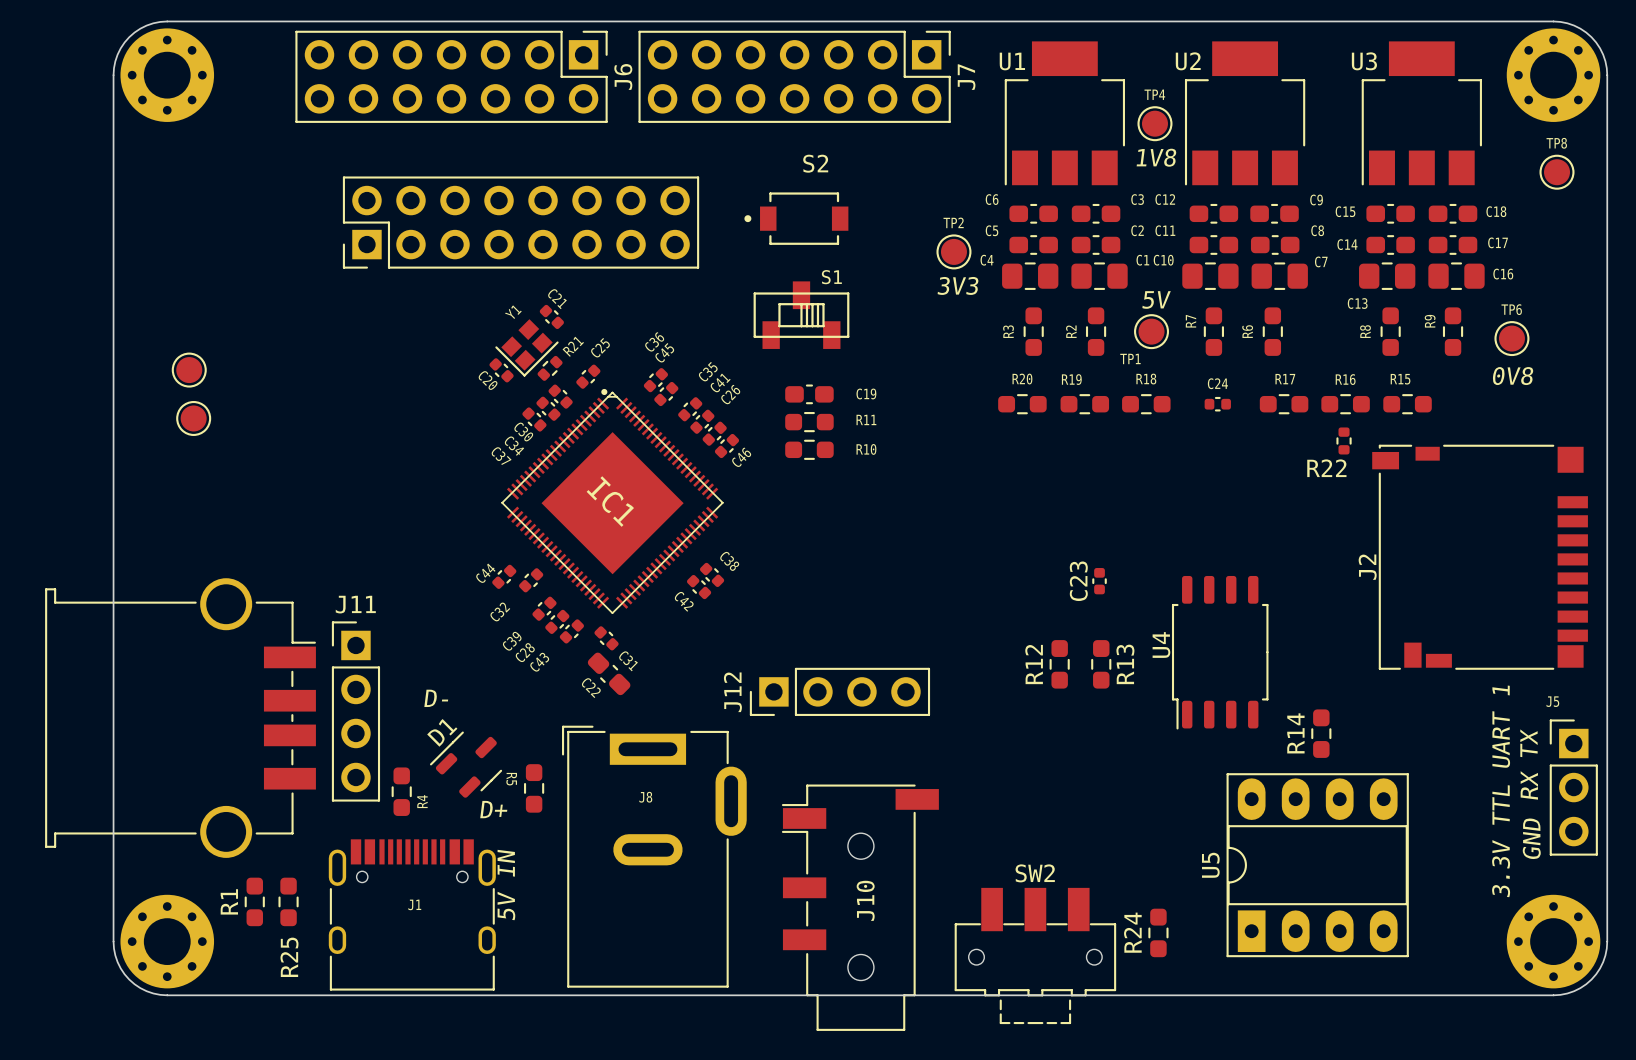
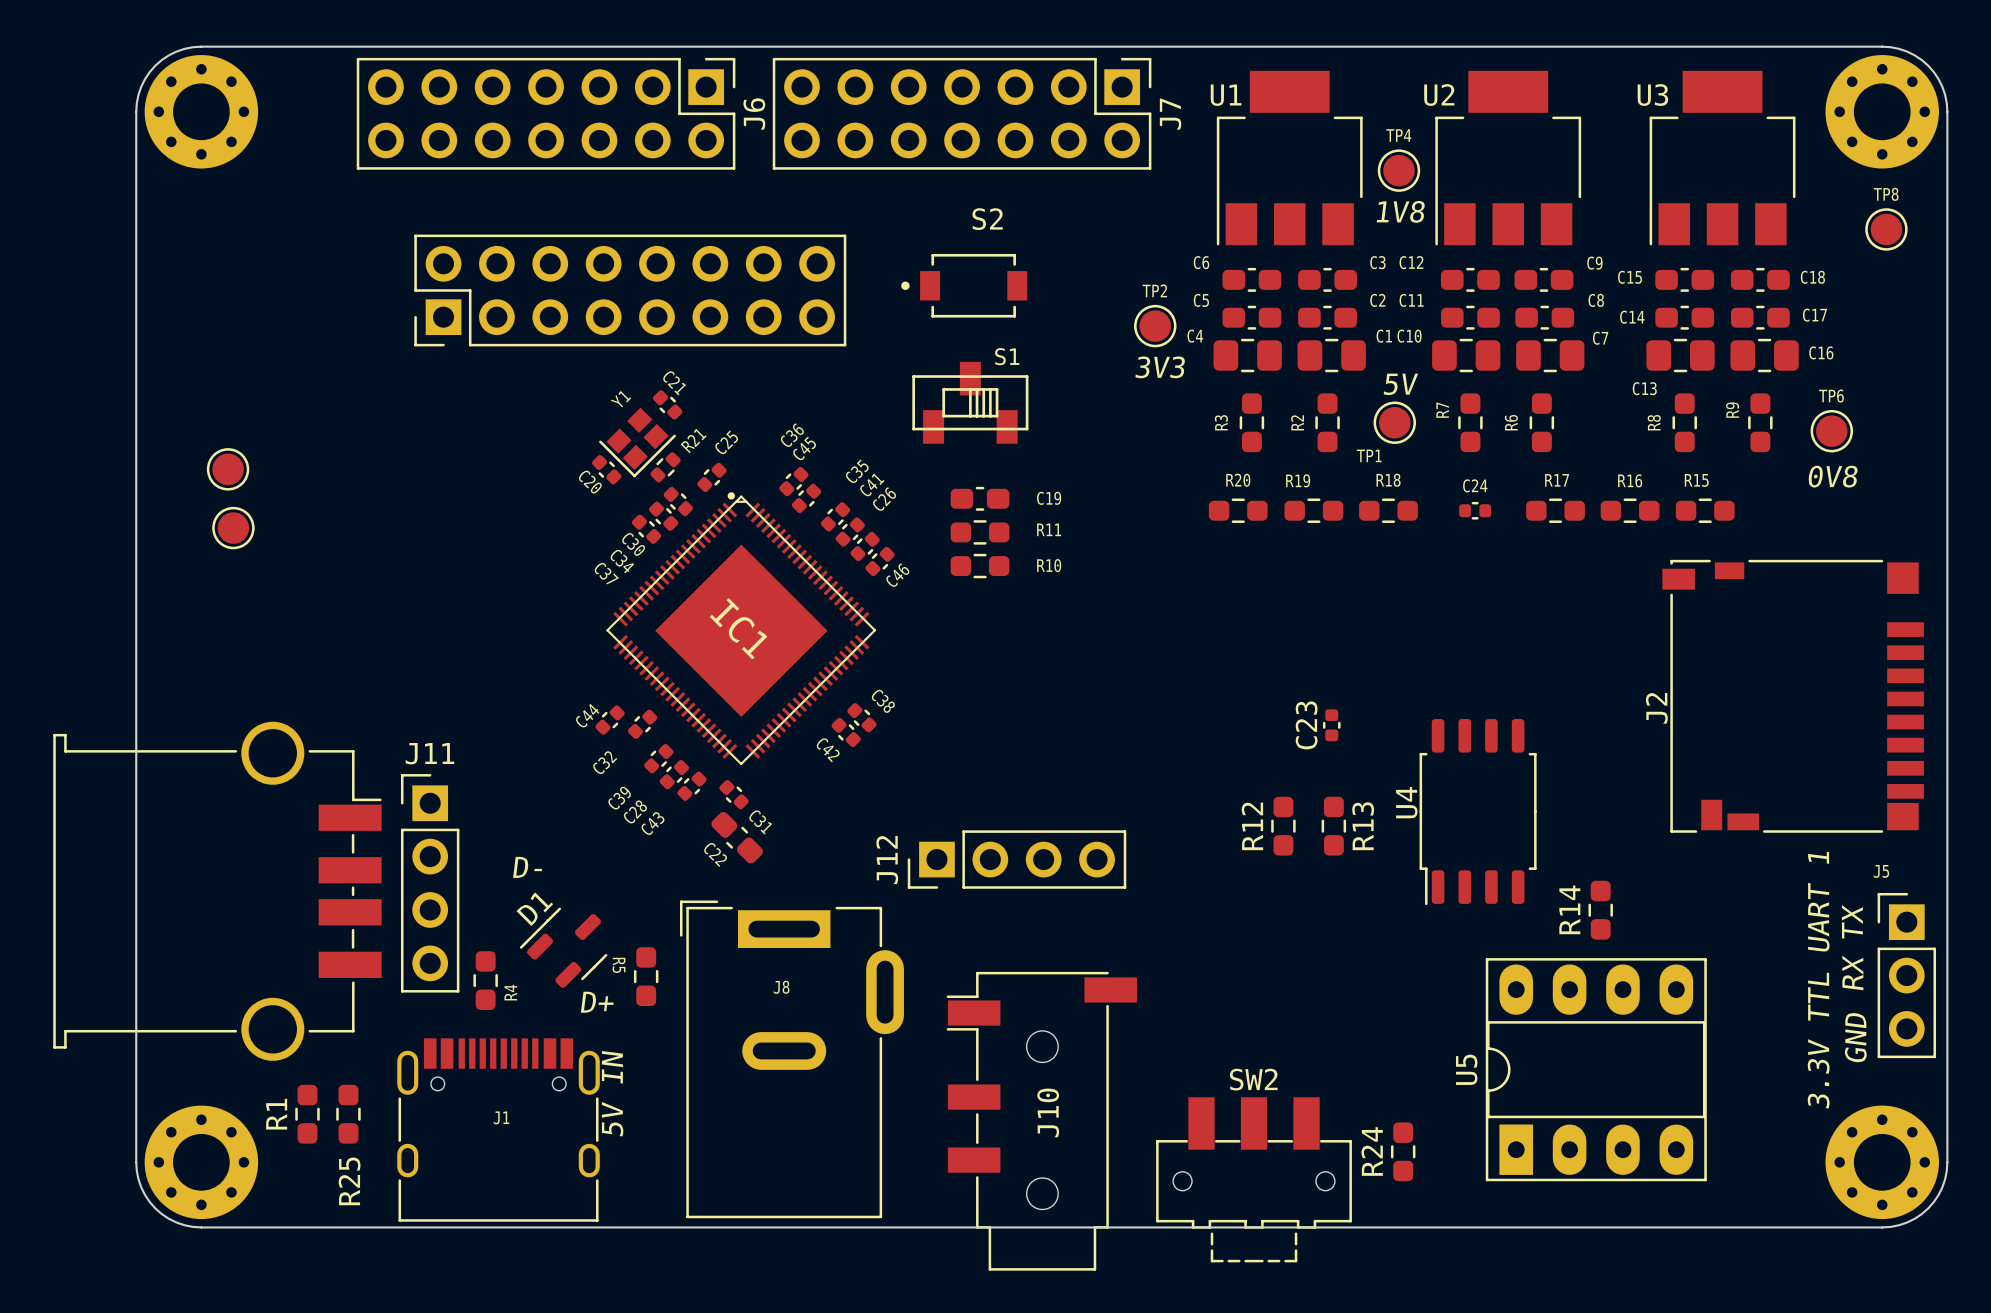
R22: (1344, 440) -> none

